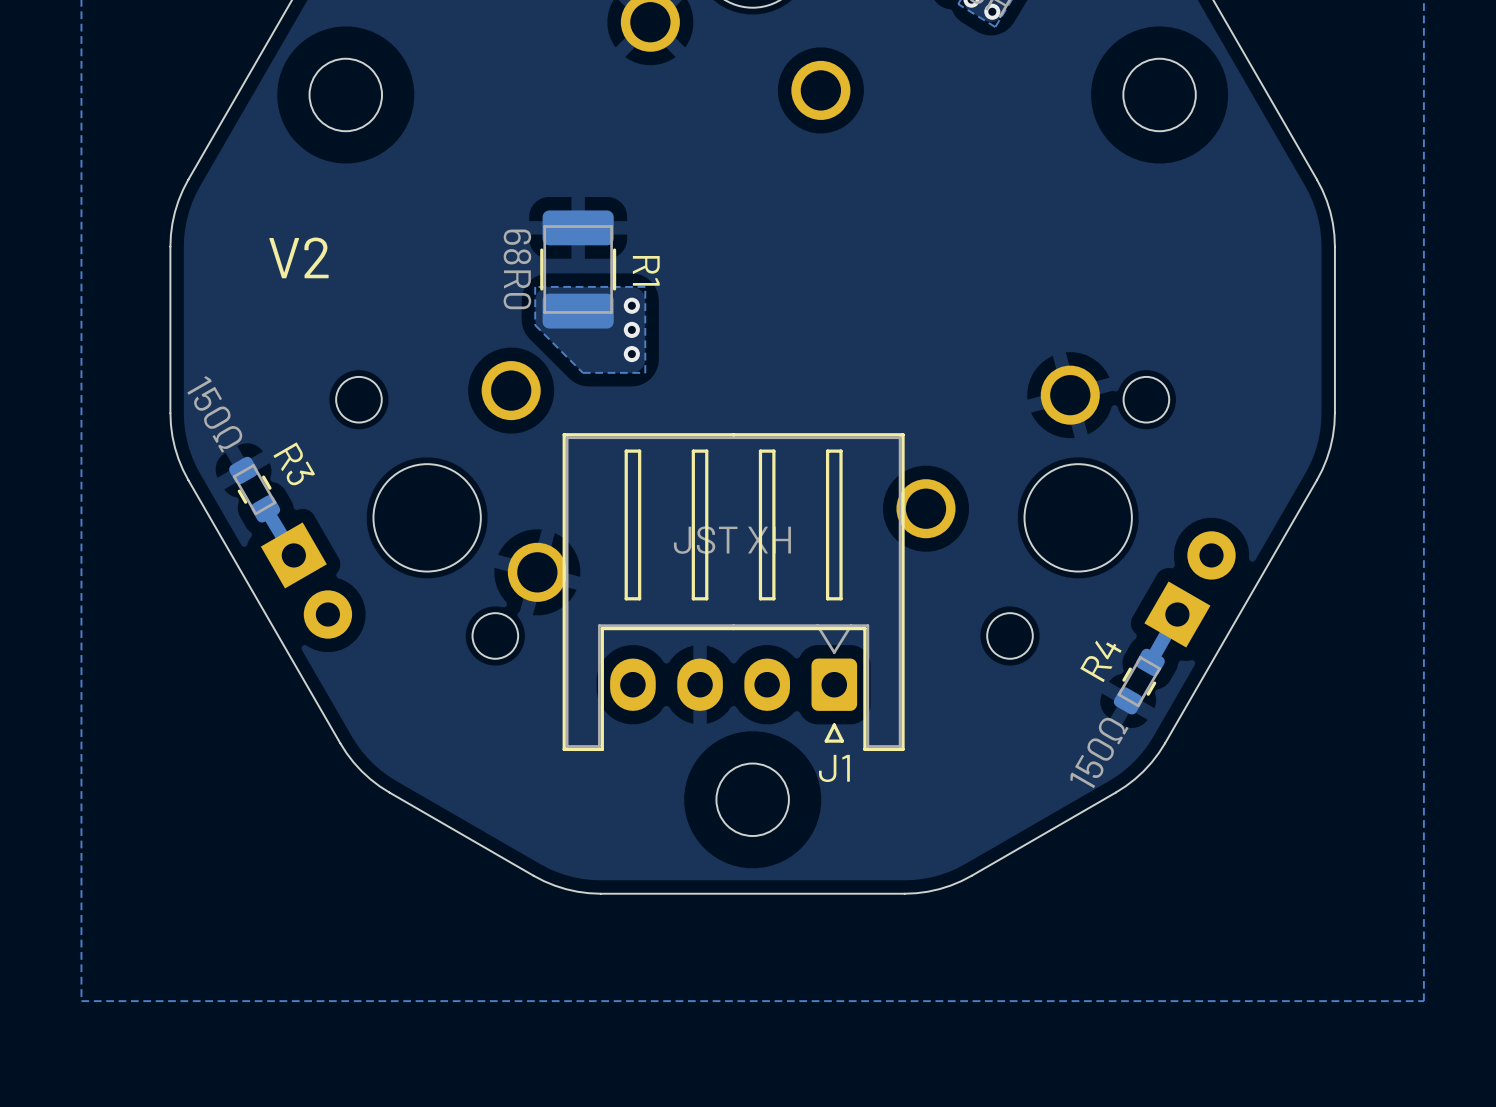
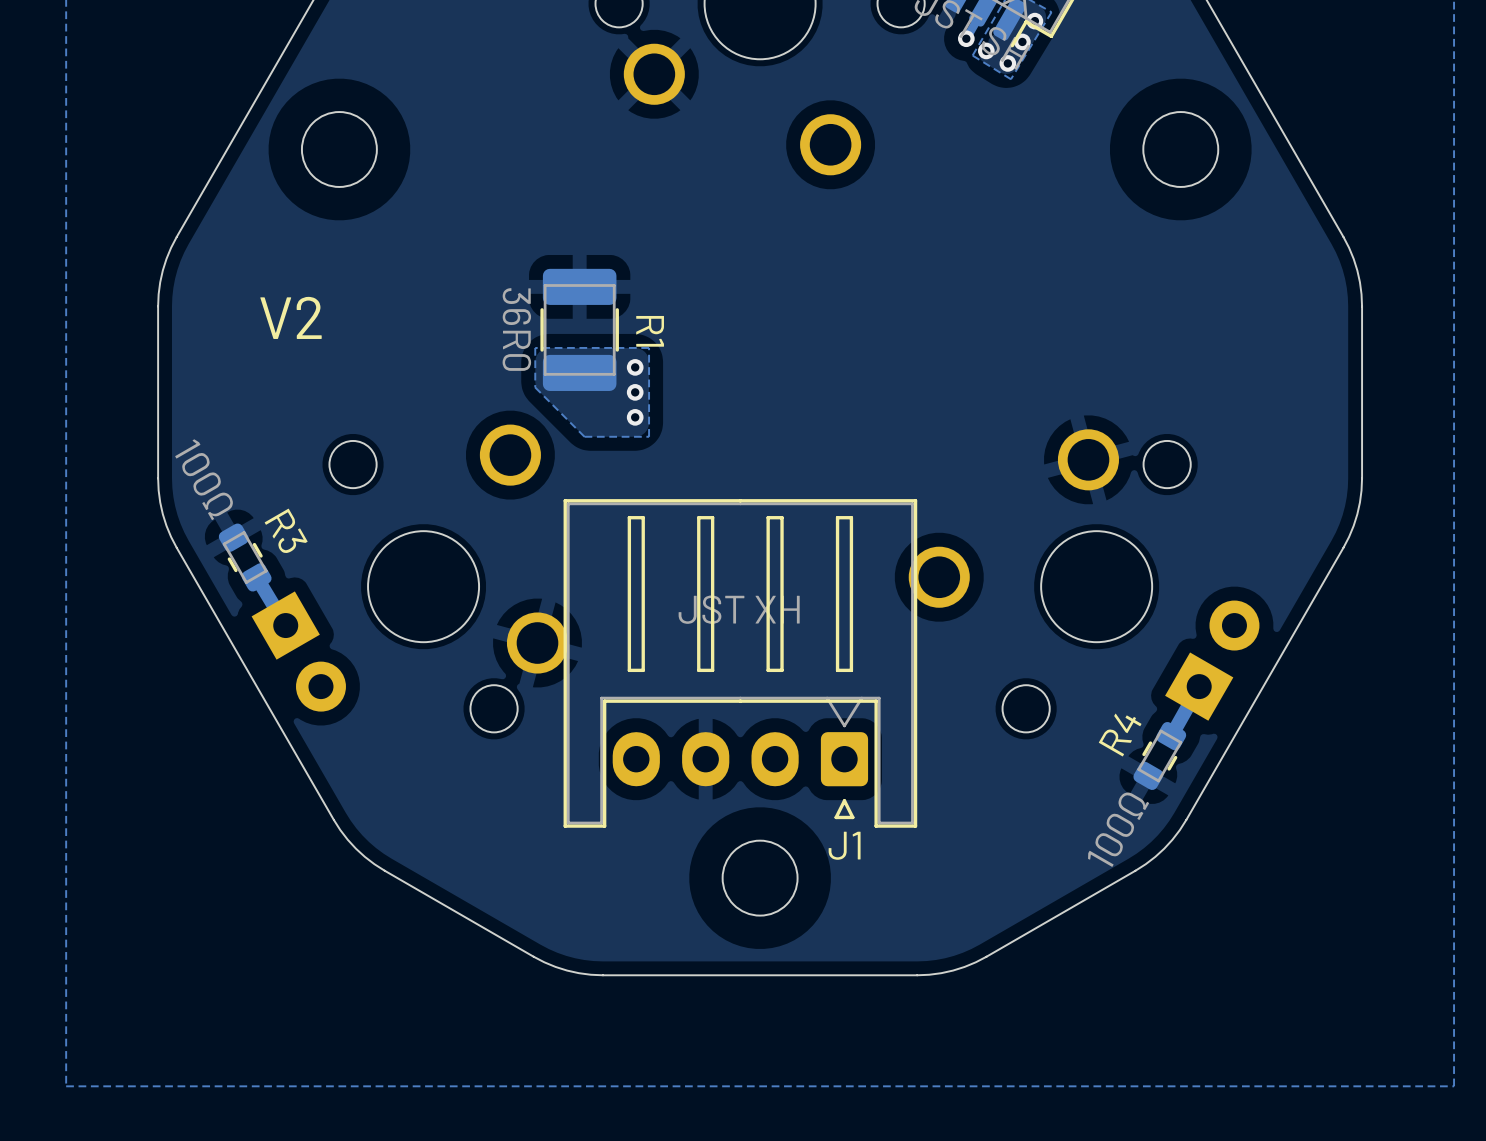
R1 value: 68R0 (517, 269) -> 36R0 (516, 329)
R3 value: 150Ω (214, 414) -> 100Ω (204, 479)
R4 value: 150Ω (1099, 752) -> 100Ω (1118, 829)

